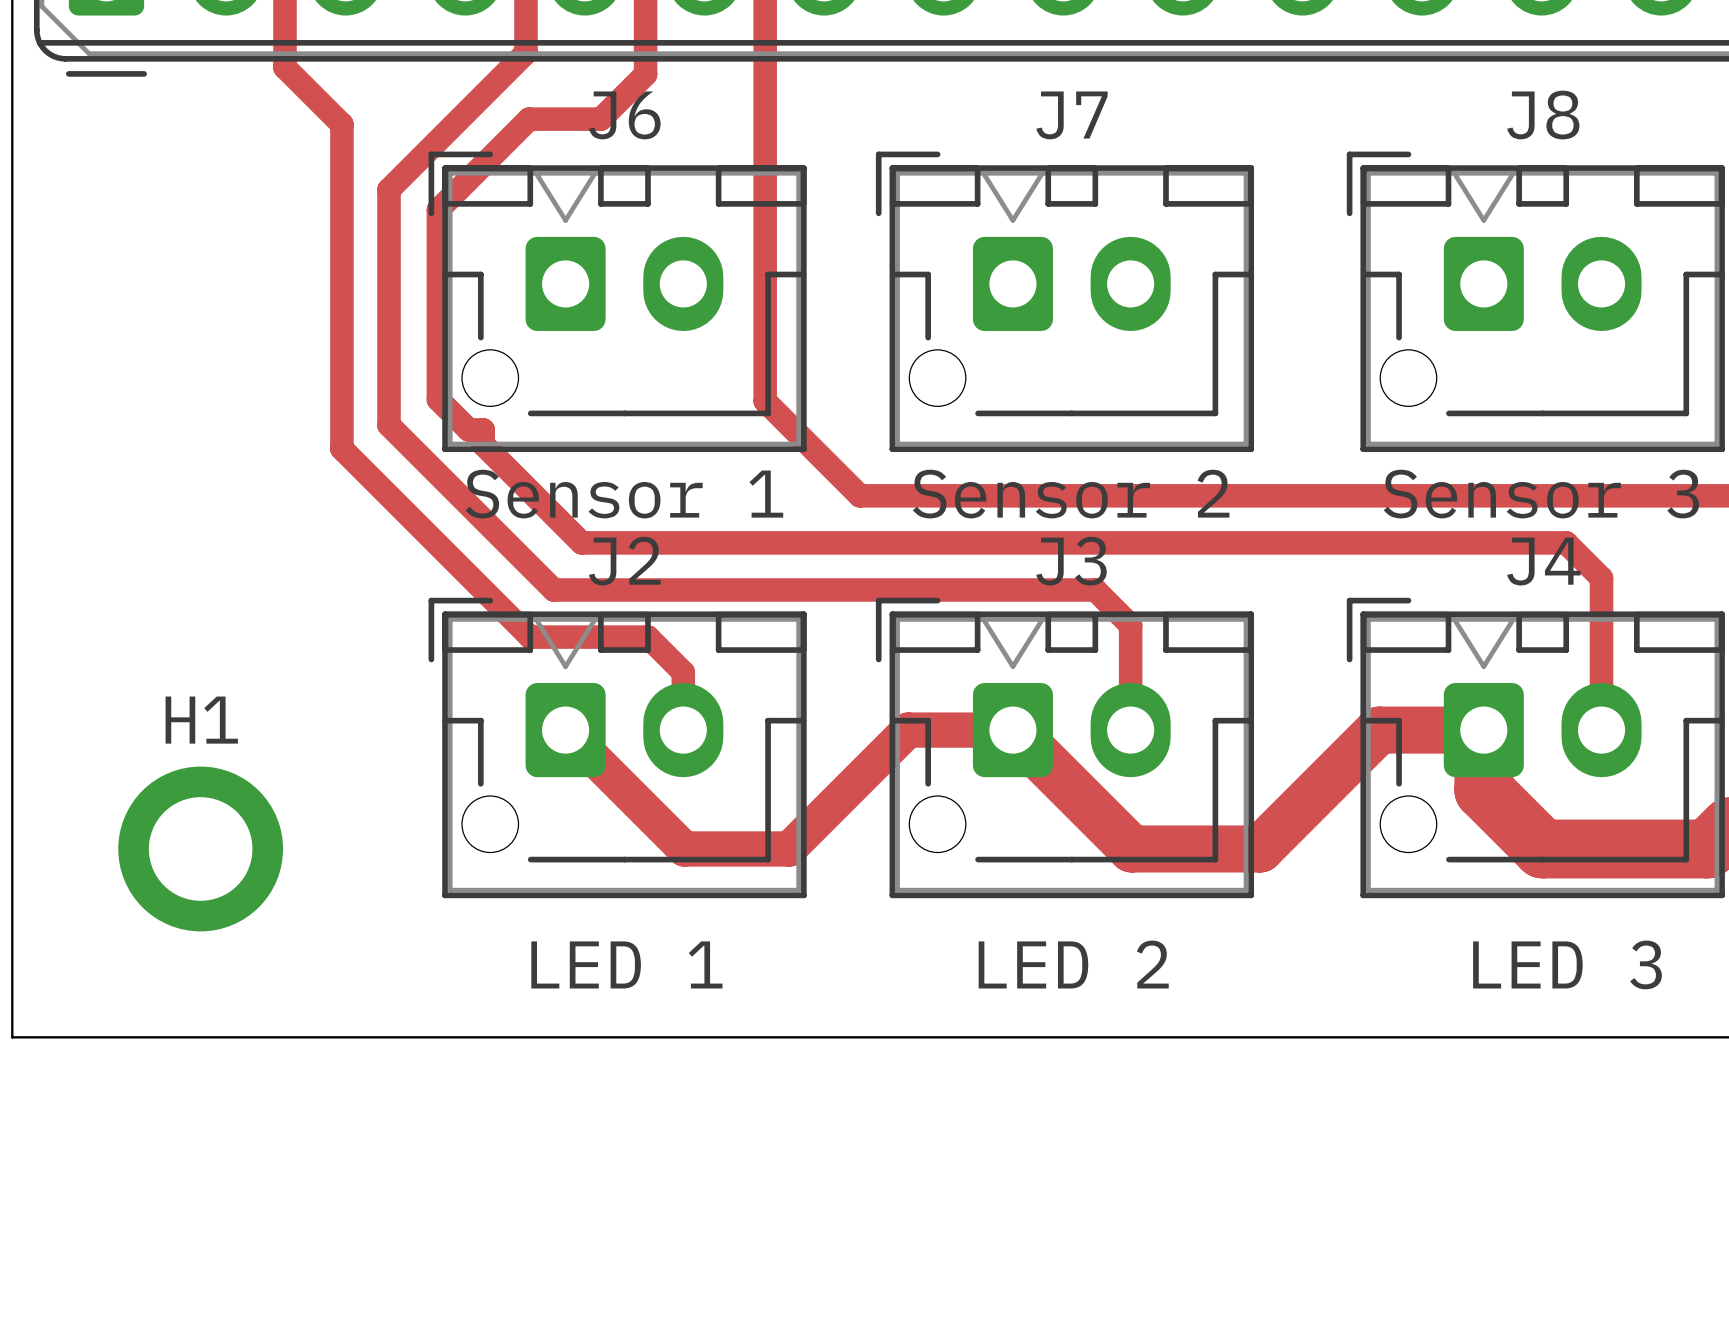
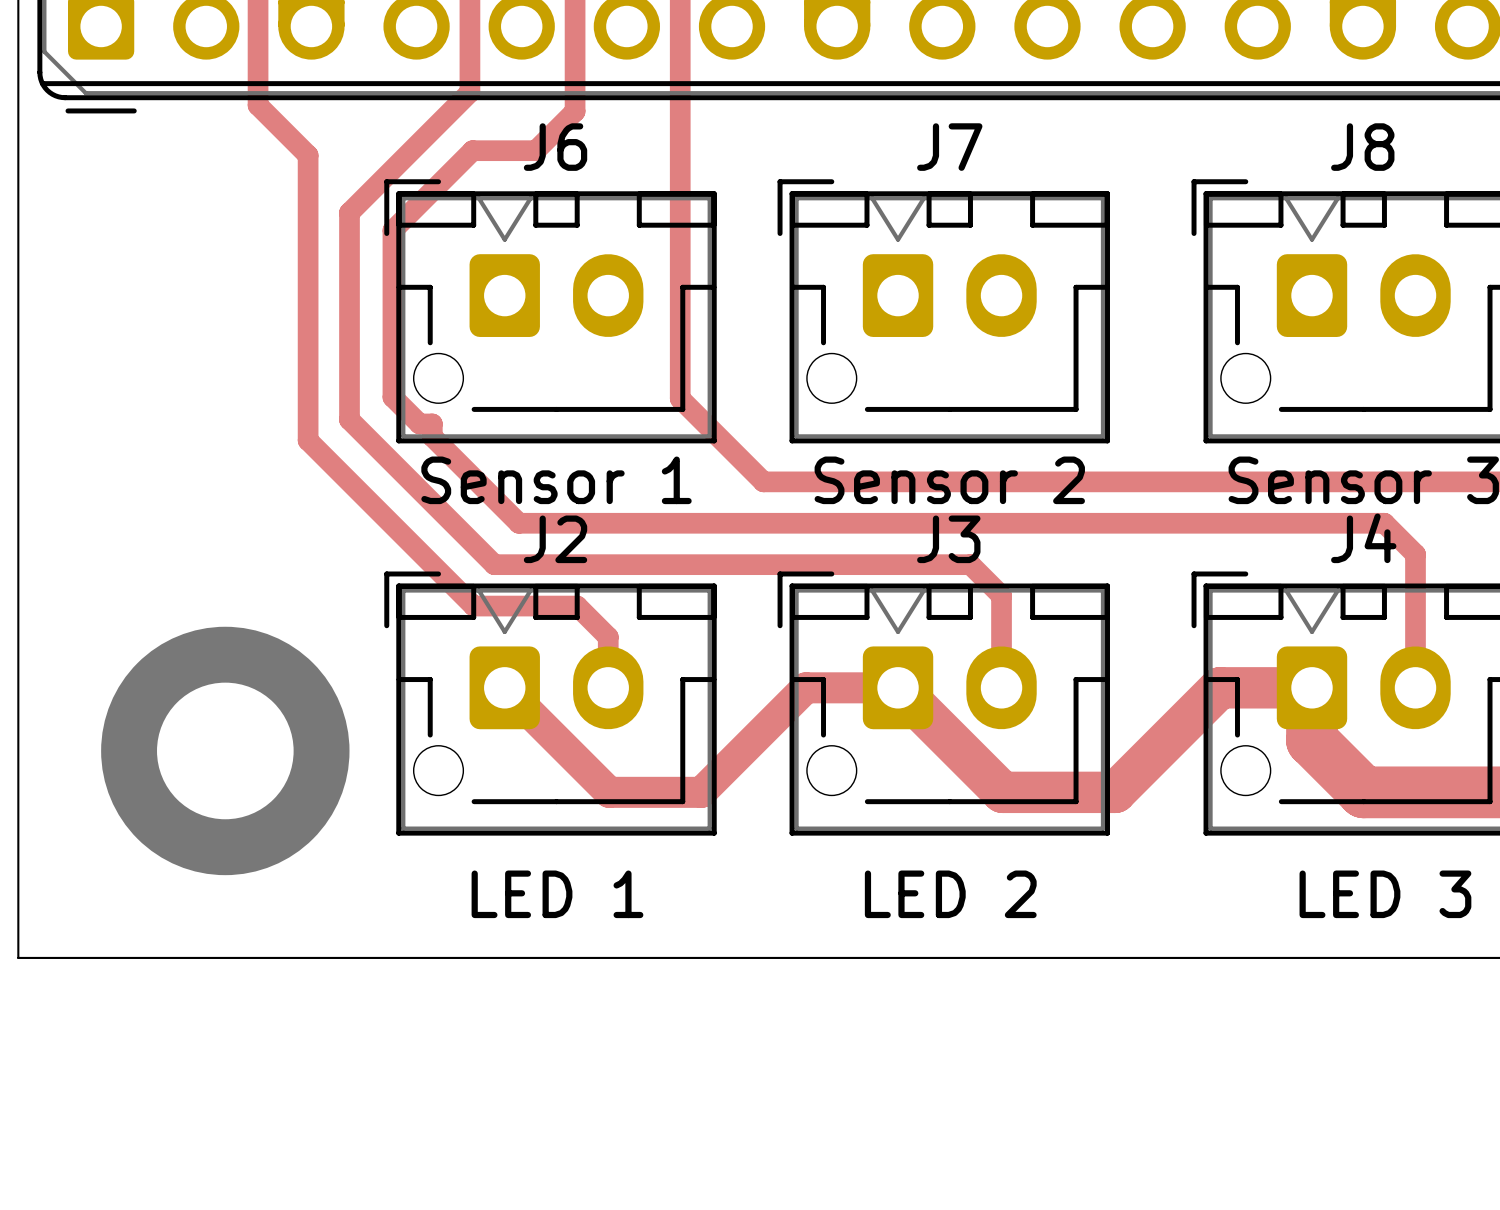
via: none -> (225, 750)
H1: (200, 848) -> none

